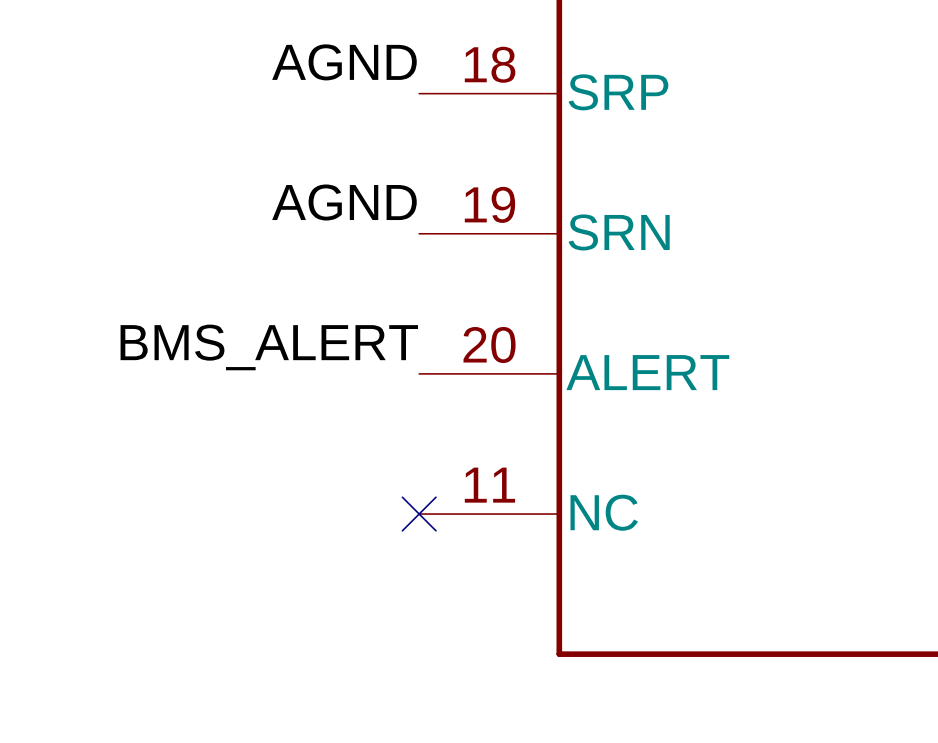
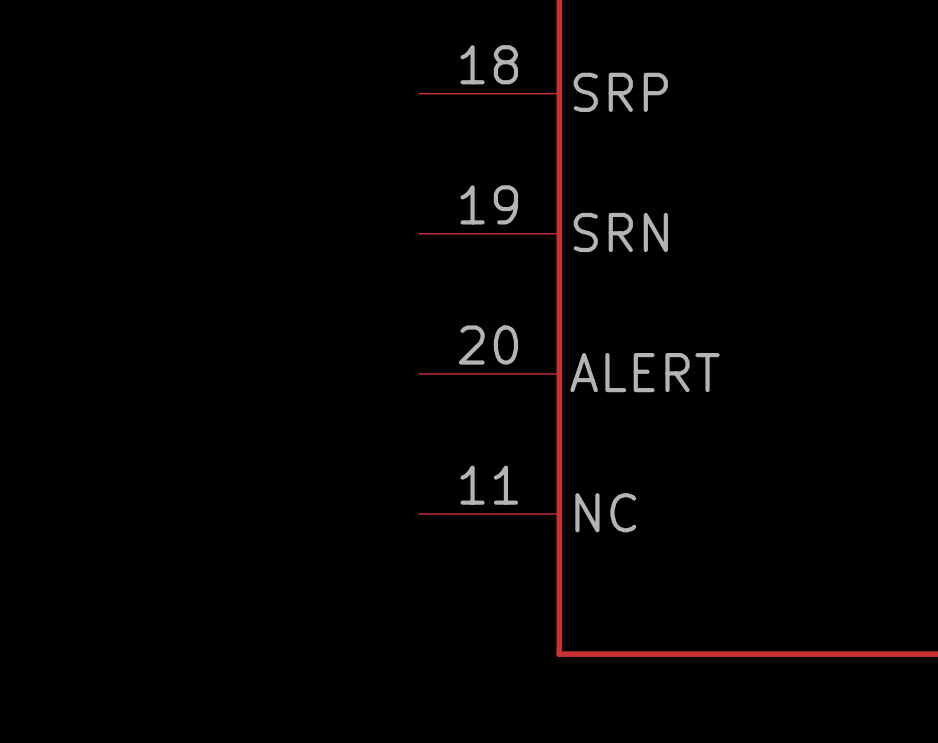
label: AGND (344, 62) -> none
label: AGND (344, 202) -> none
label: BMS_ALERT (269, 347) -> none
no-connect mark: (419, 514) -> none

